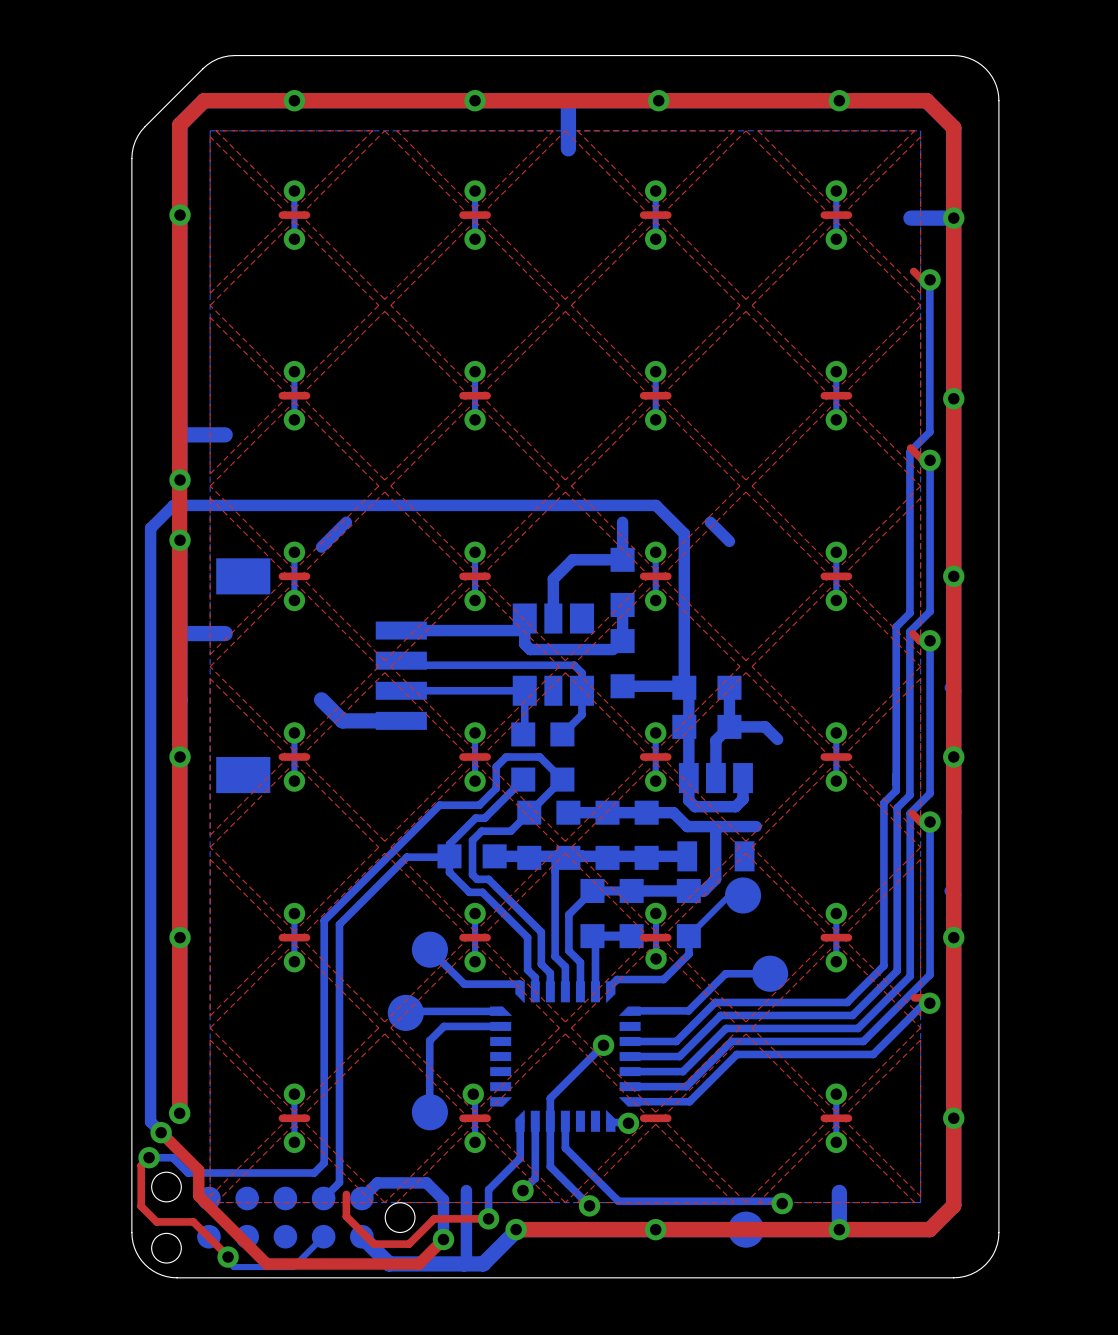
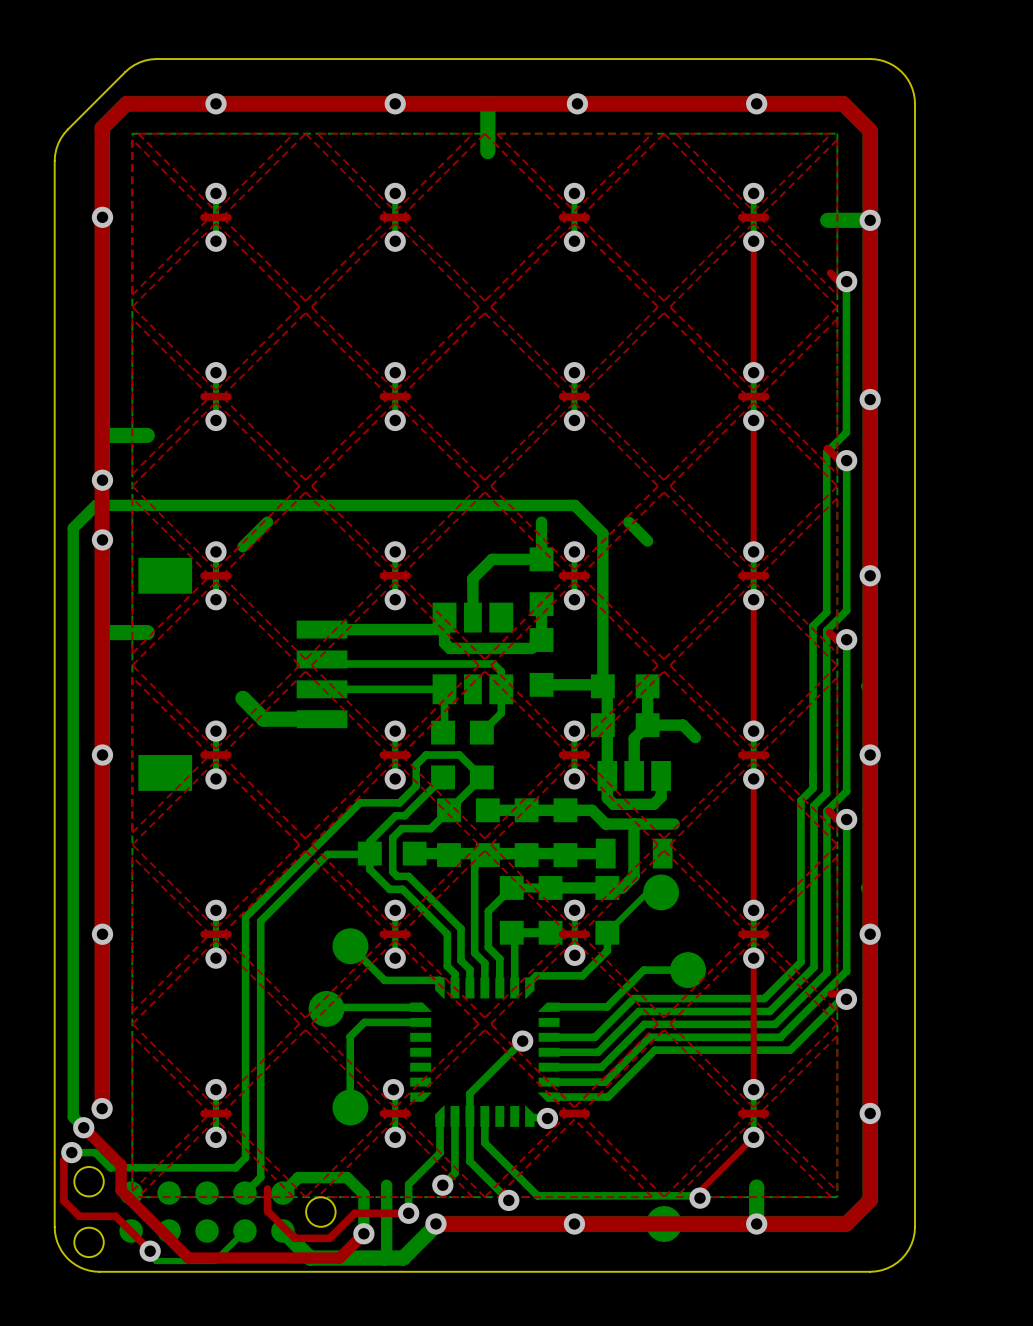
top track: none -> (753, 241) (753, 372)
top track: none -> (753, 420) (753, 551)
top track: none -> (753, 599) (753, 731)
top track: none -> (753, 778) (753, 910)
top track: none -> (753, 958) (753, 1089)
top track: none -> (753, 1137) (700, 1191) (700, 1198)

